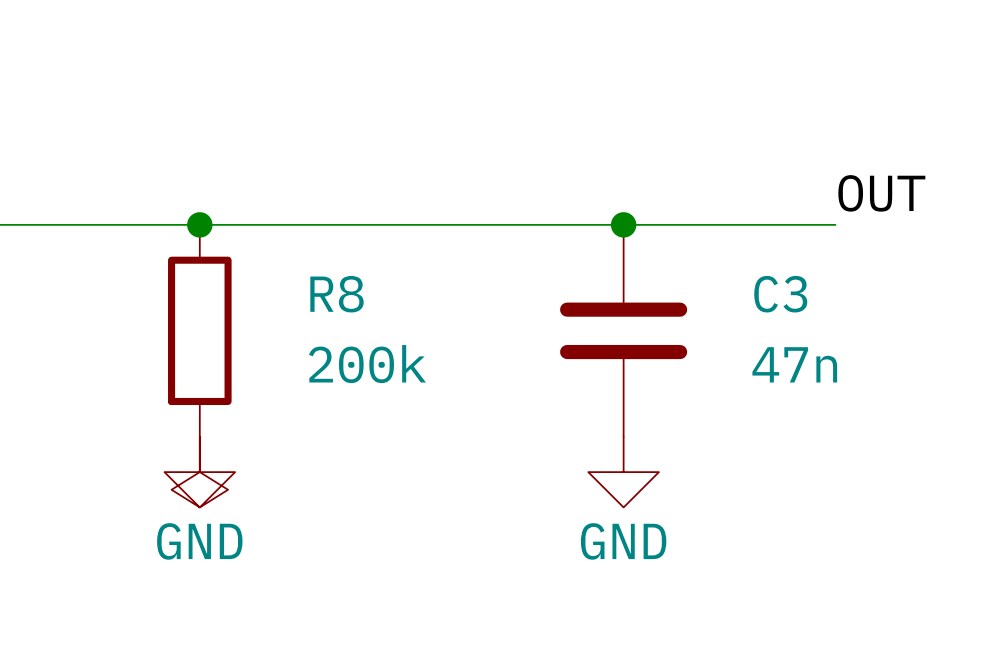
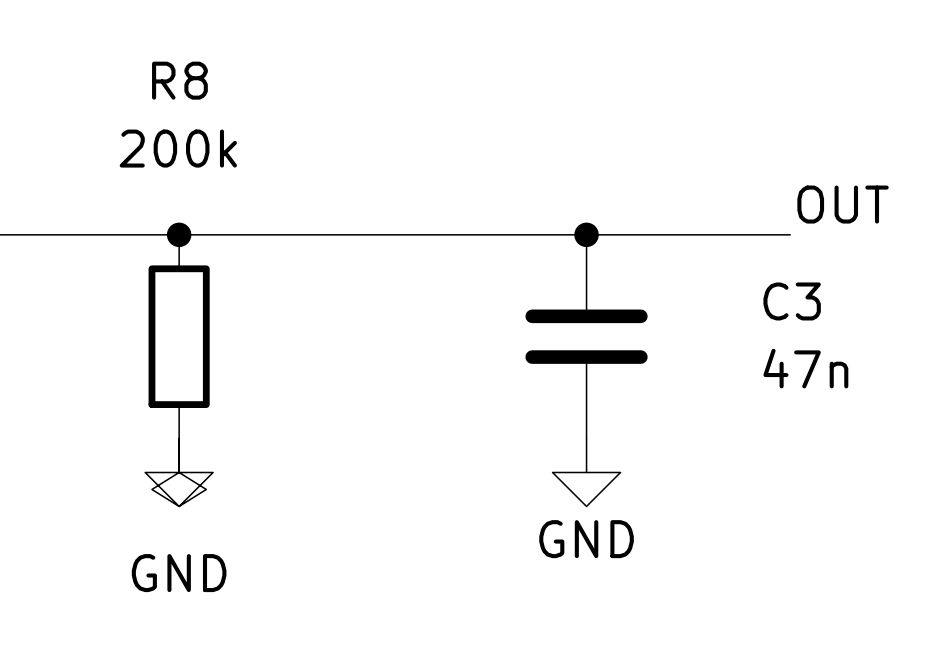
R8 name position: R8 (337, 294) -> R8 (179, 80)
C3 name position: C3 (780, 294) -> C3 (792, 301)
R8 value position: 200k (367, 364) -> 200k (178, 148)
C3 value position: 47n (794, 364) -> 47n (805, 368)
power symbol text position: GND (199, 541) -> GND (179, 573)

